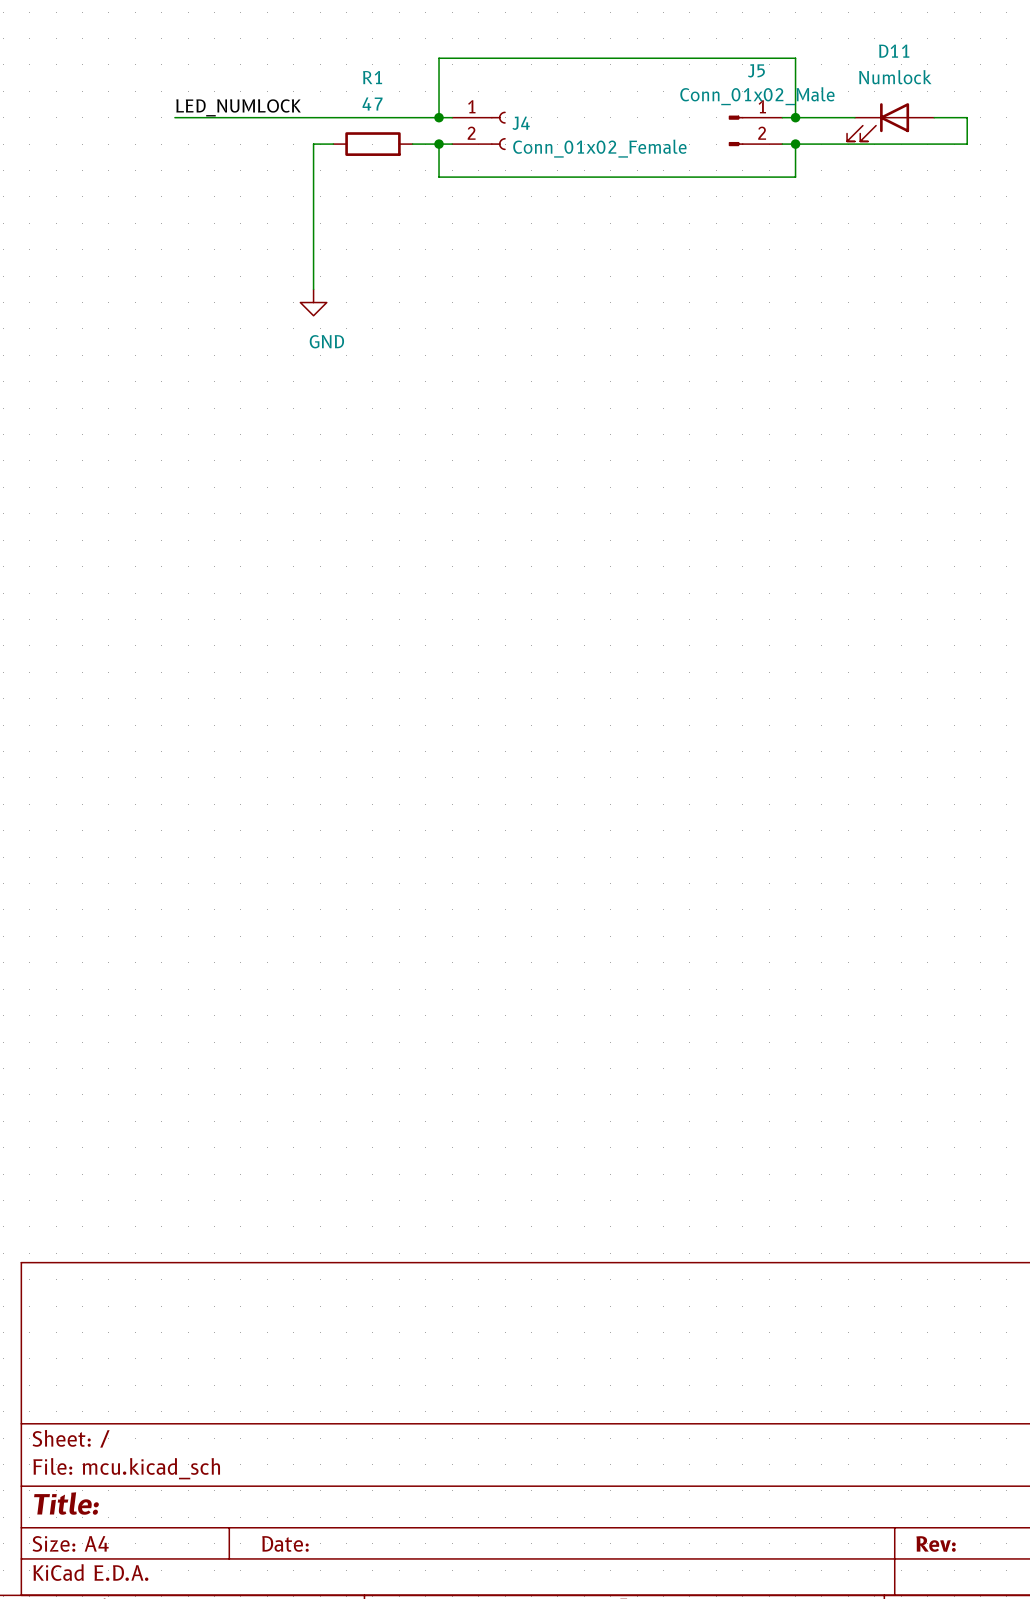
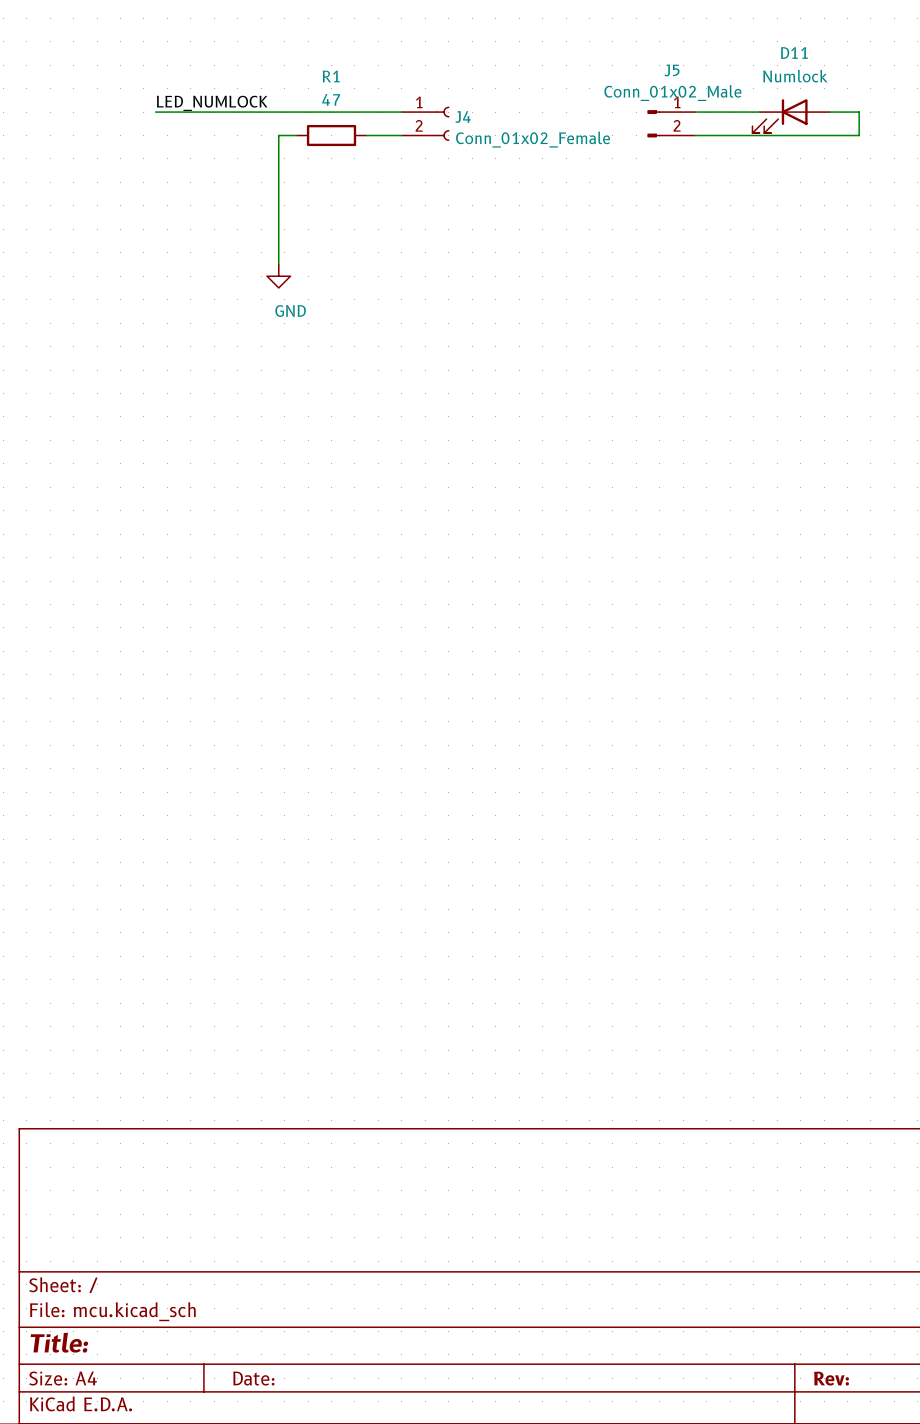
wire: (439, 117) (439, 58) (795, 58) (795, 117) -> none
junction: (439, 117) -> none
junction: (795, 117) -> none
wire: (439, 144) (439, 177) (795, 177) (795, 144) -> none
junction: (439, 144) -> none
junction: (795, 144) -> none

